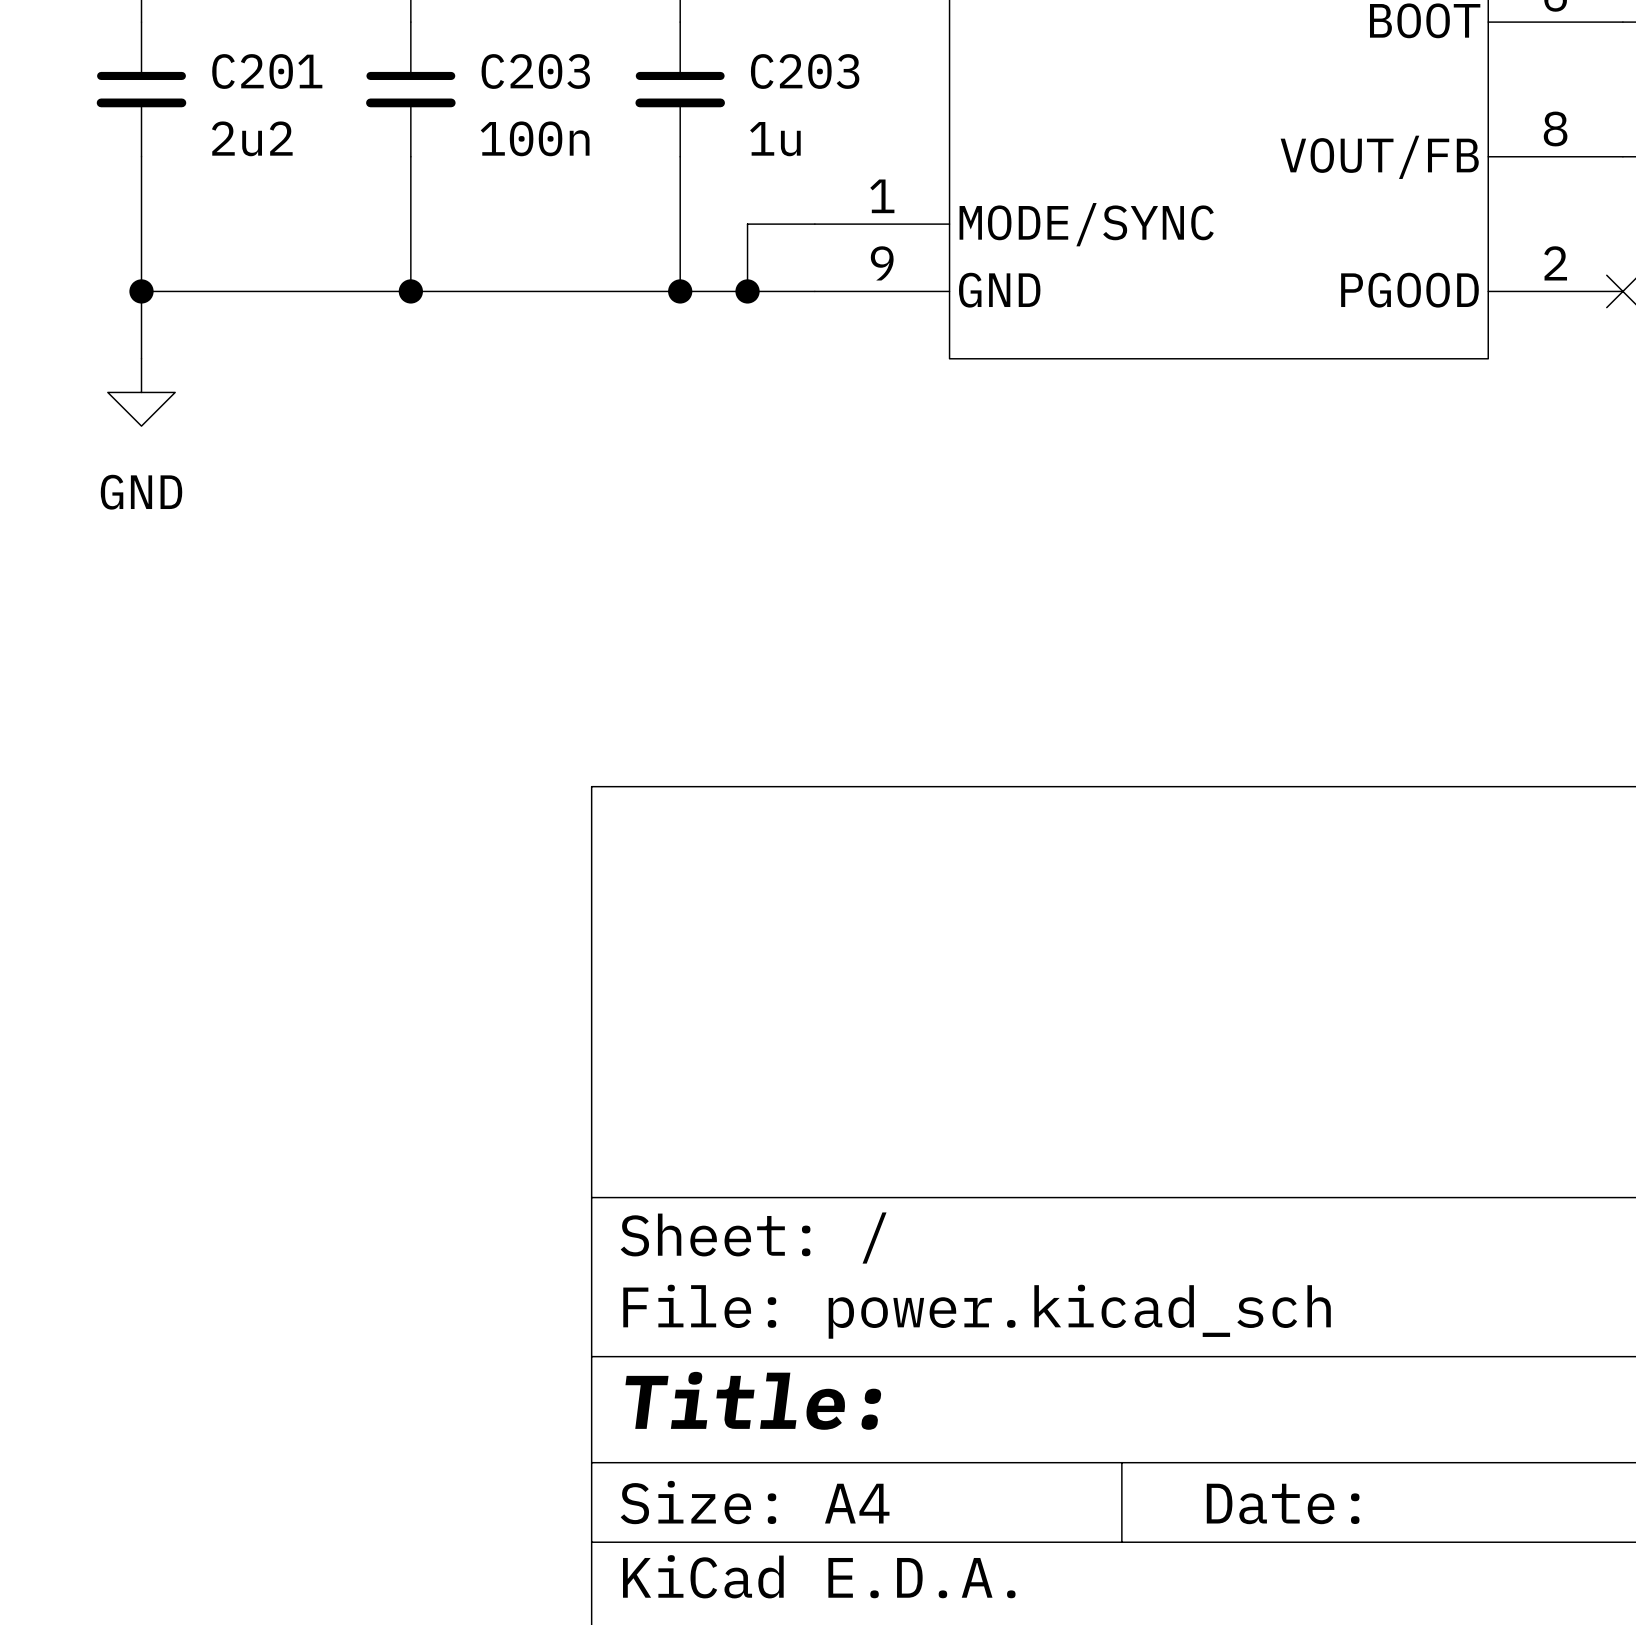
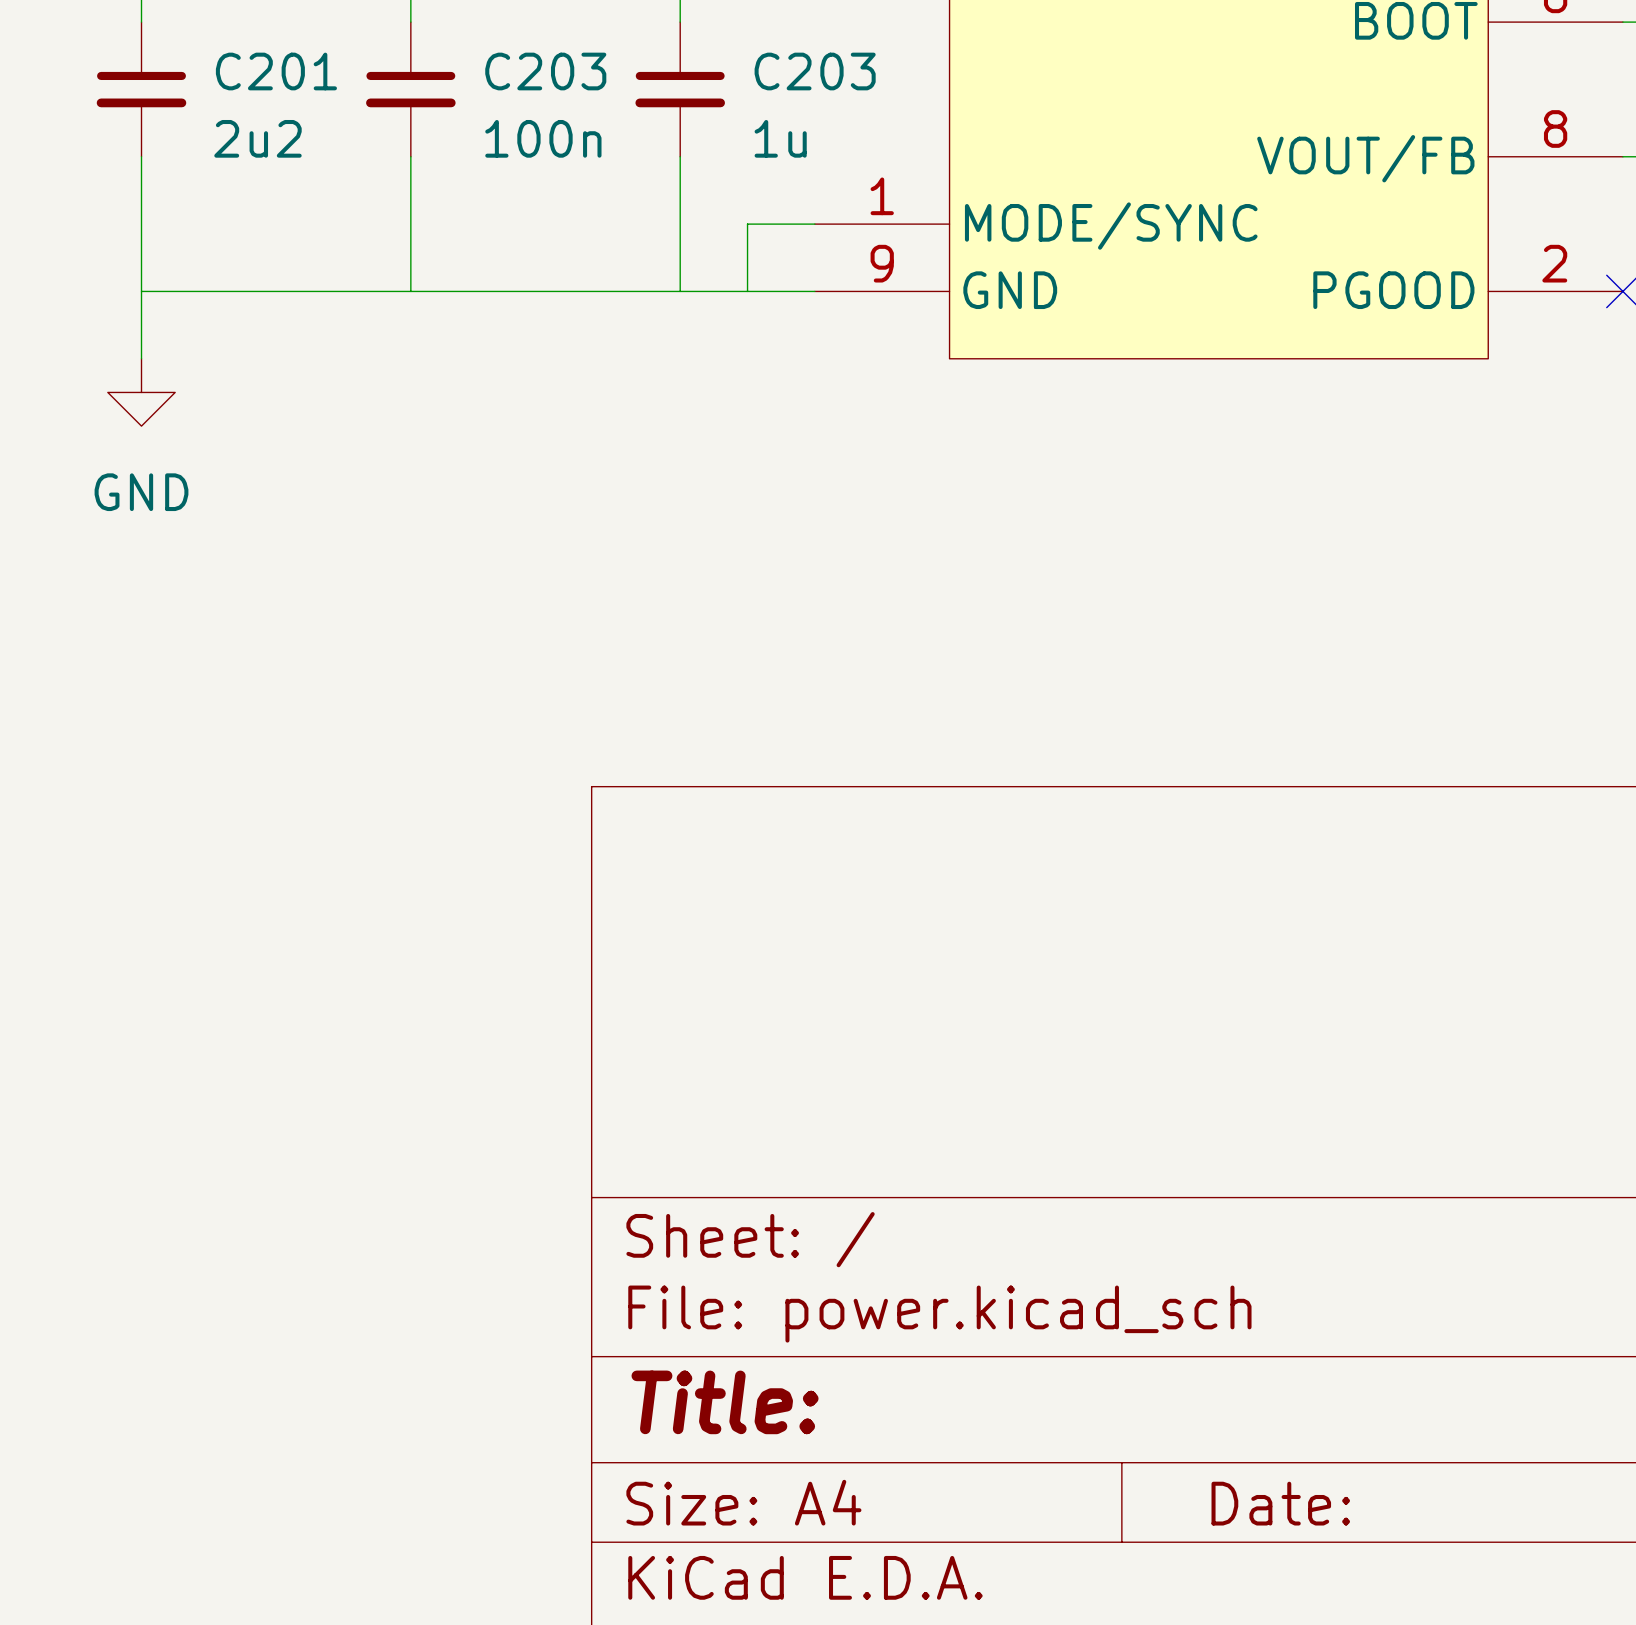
junction: (141, 291) -> none
junction: (410, 291) -> none
junction: (680, 291) -> none
junction: (747, 291) -> none

